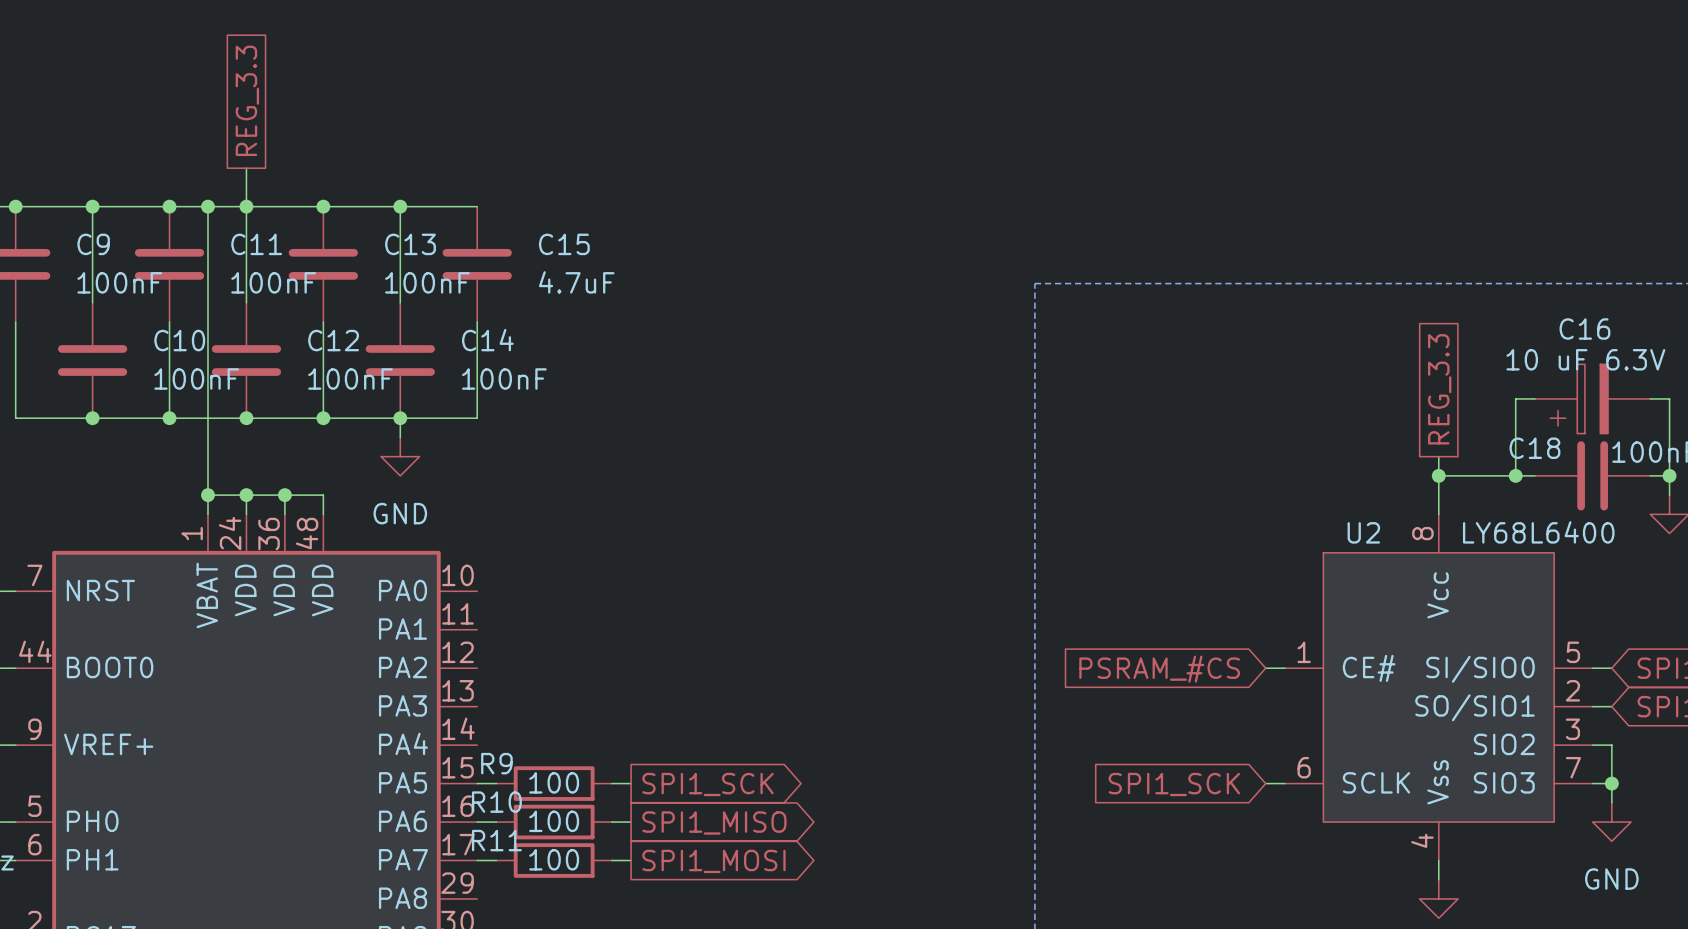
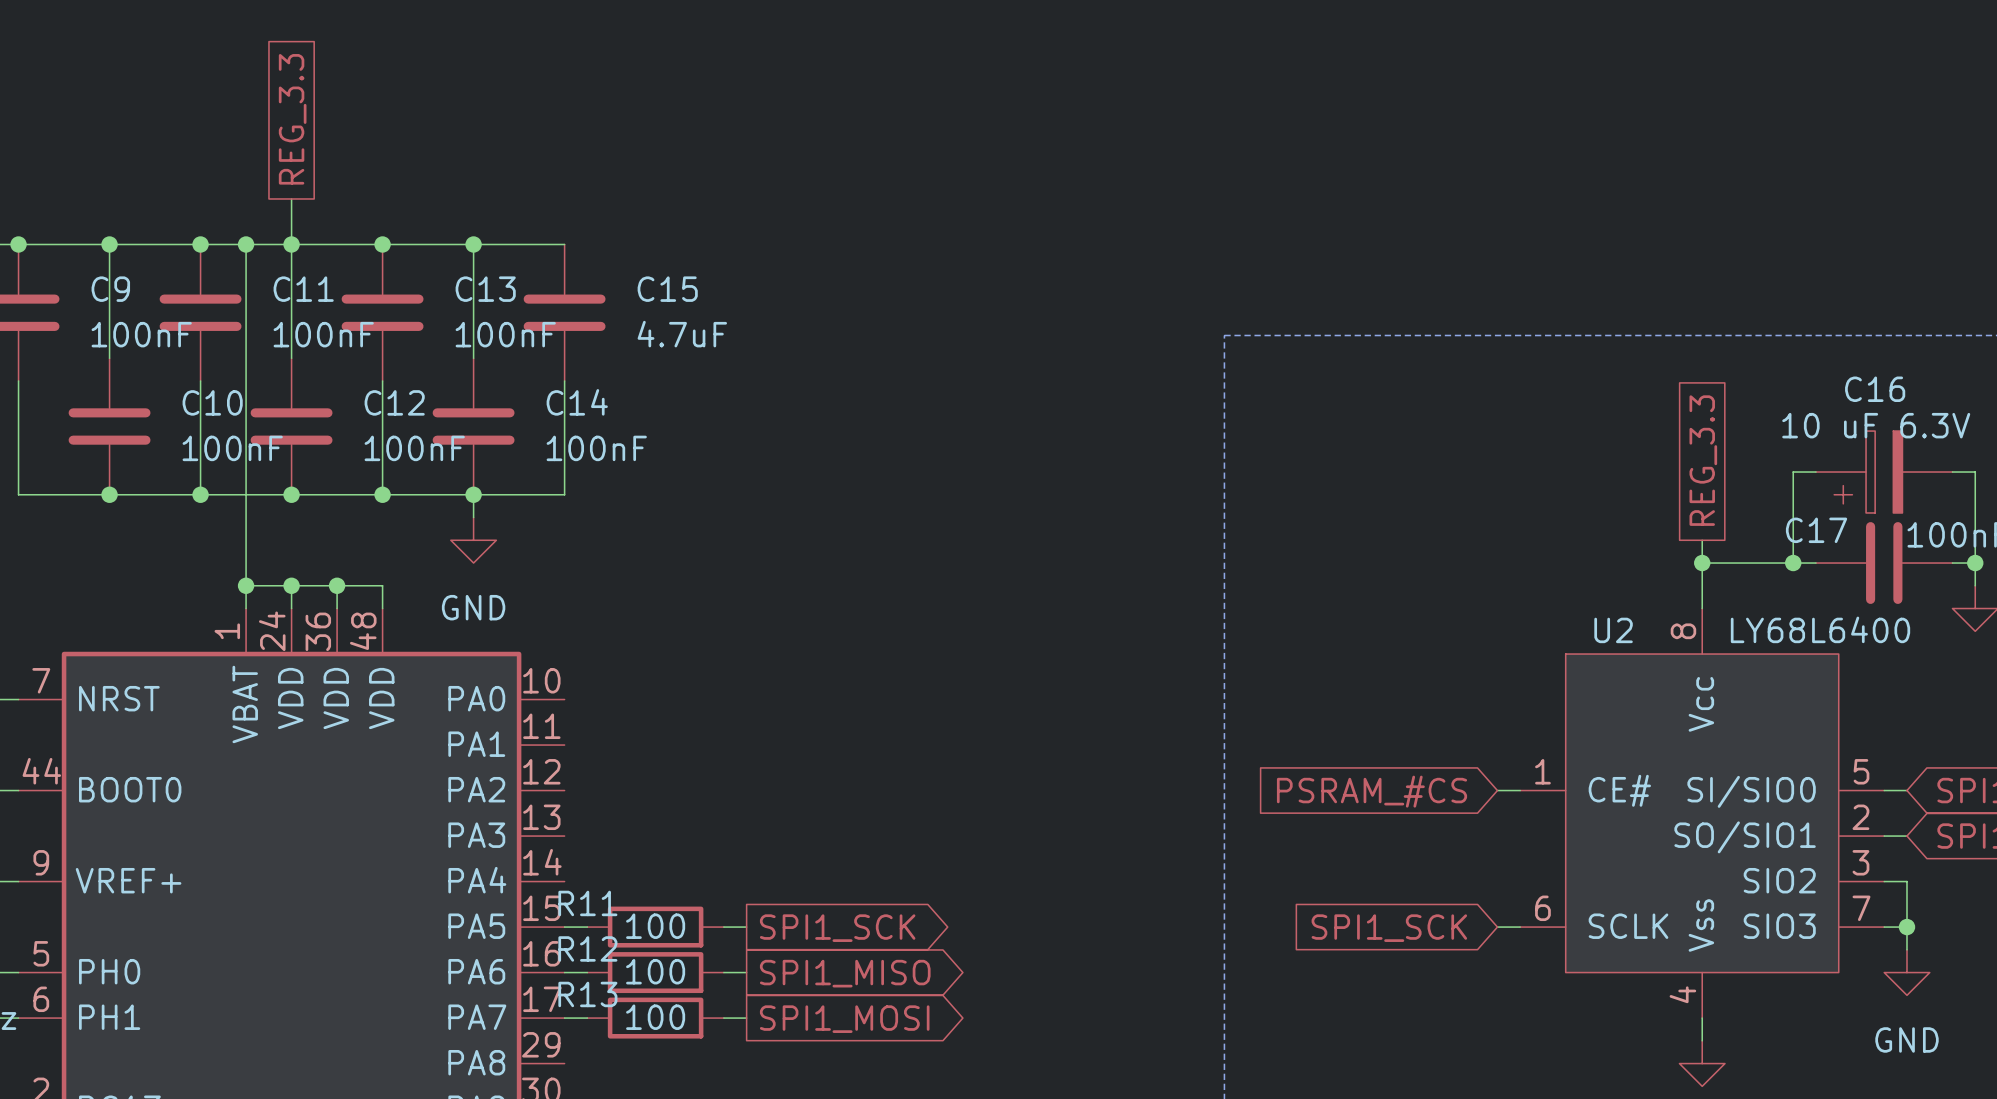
C18 name: C18 (1534, 448) -> C17 (1816, 530)
R9 name: R9 (496, 763) -> R11 (587, 903)
R10 name: R10 (496, 802) -> R12 (587, 948)
R11 name: R11 (496, 840) -> R13 (587, 994)

